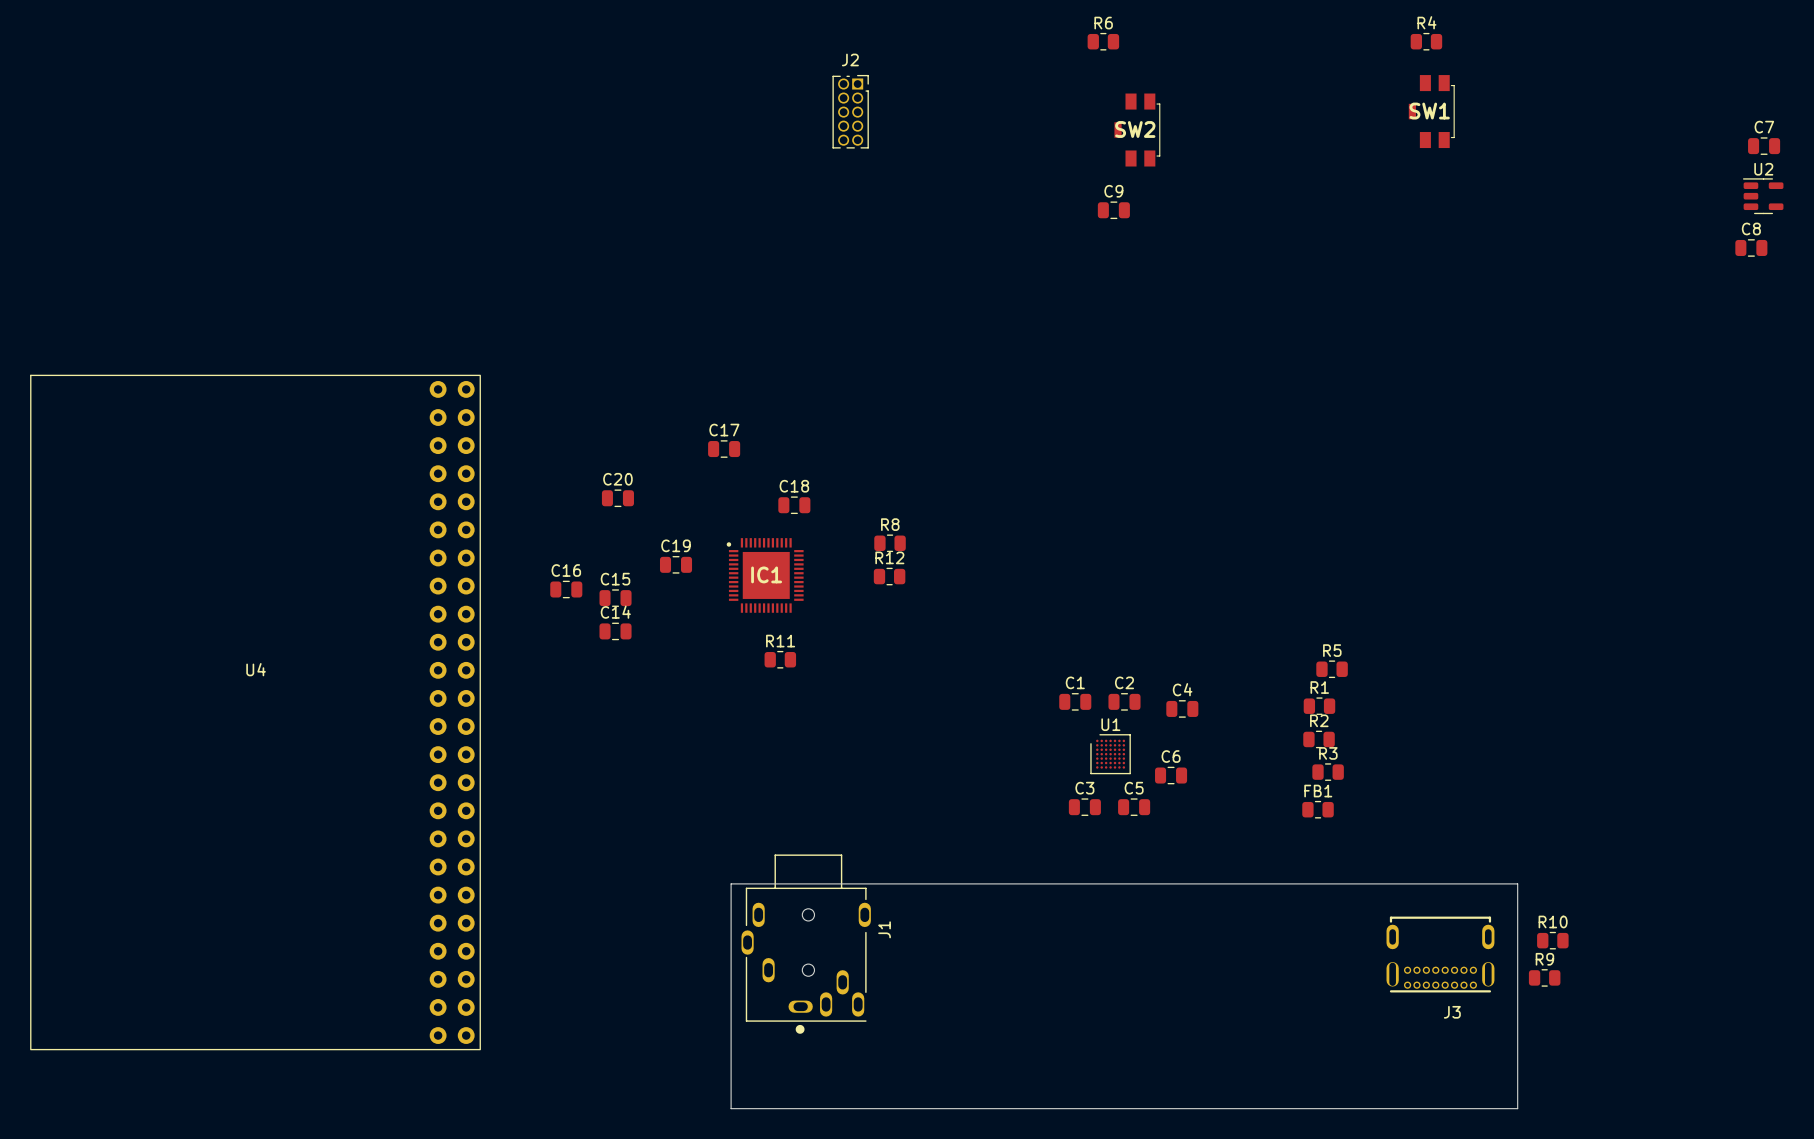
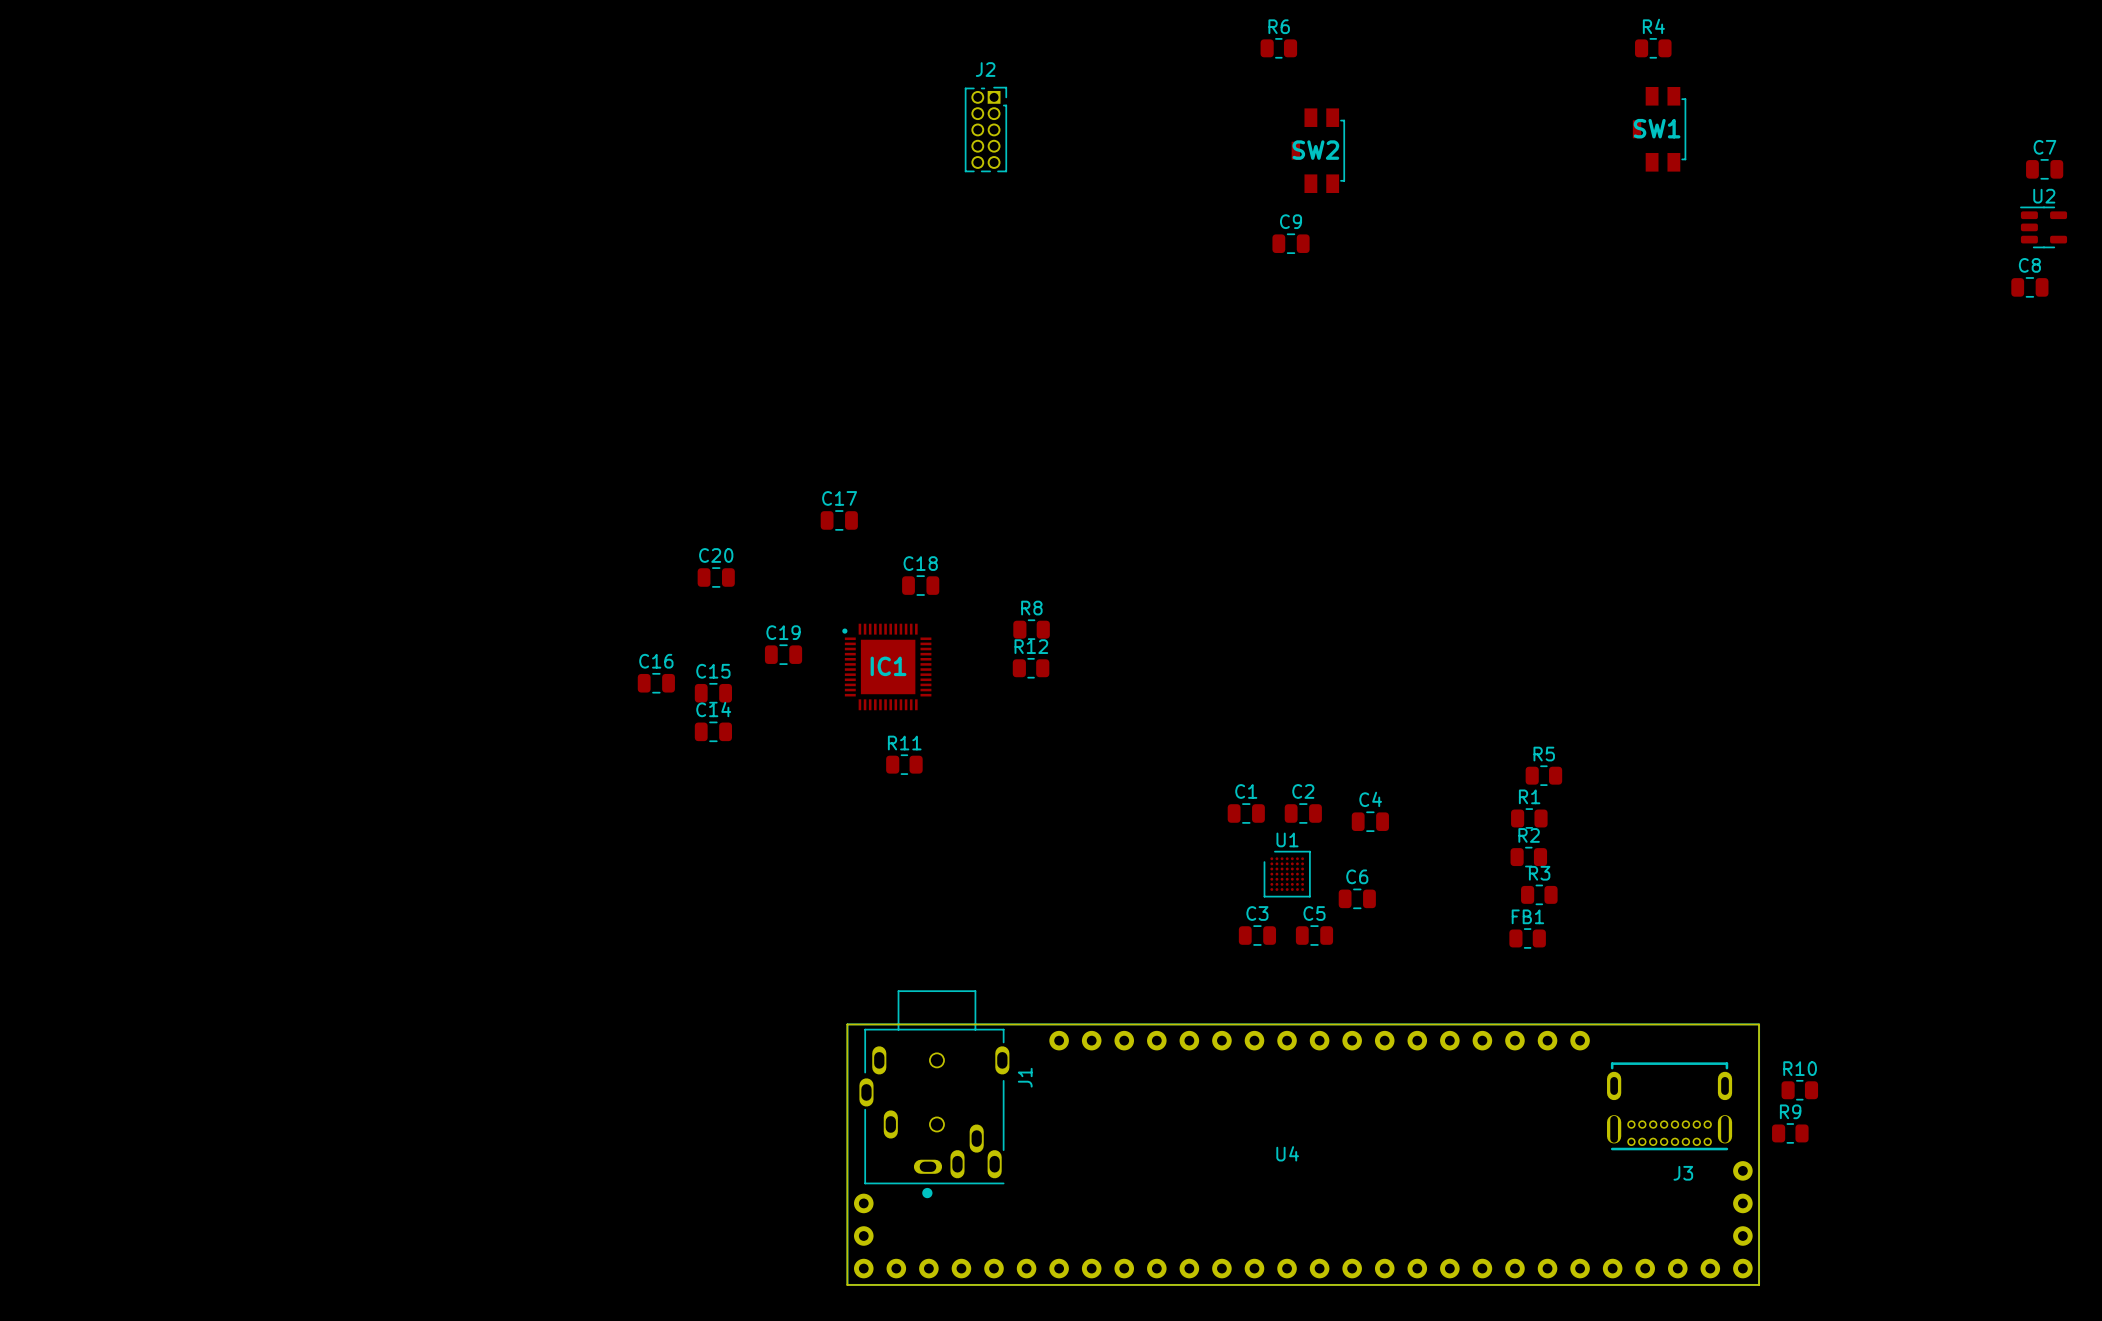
U4 footprint: [30, 374, 481, 1051] -> [846, 1023, 1760, 1286]
U4 name position: U4 (256, 669) -> U4 (1287, 1153)

